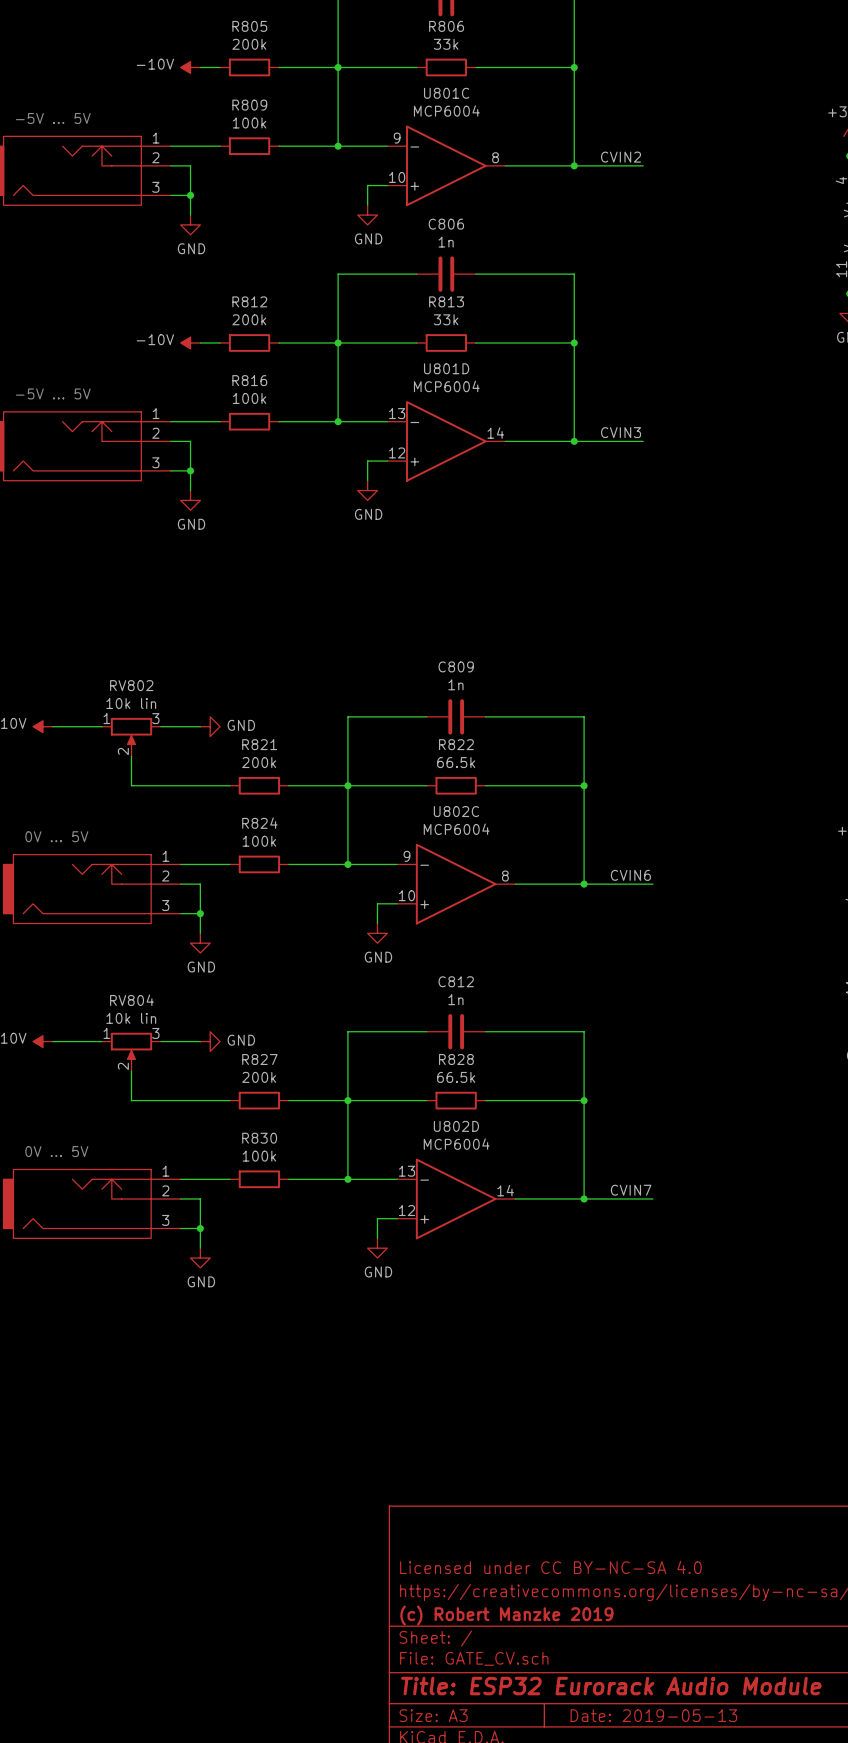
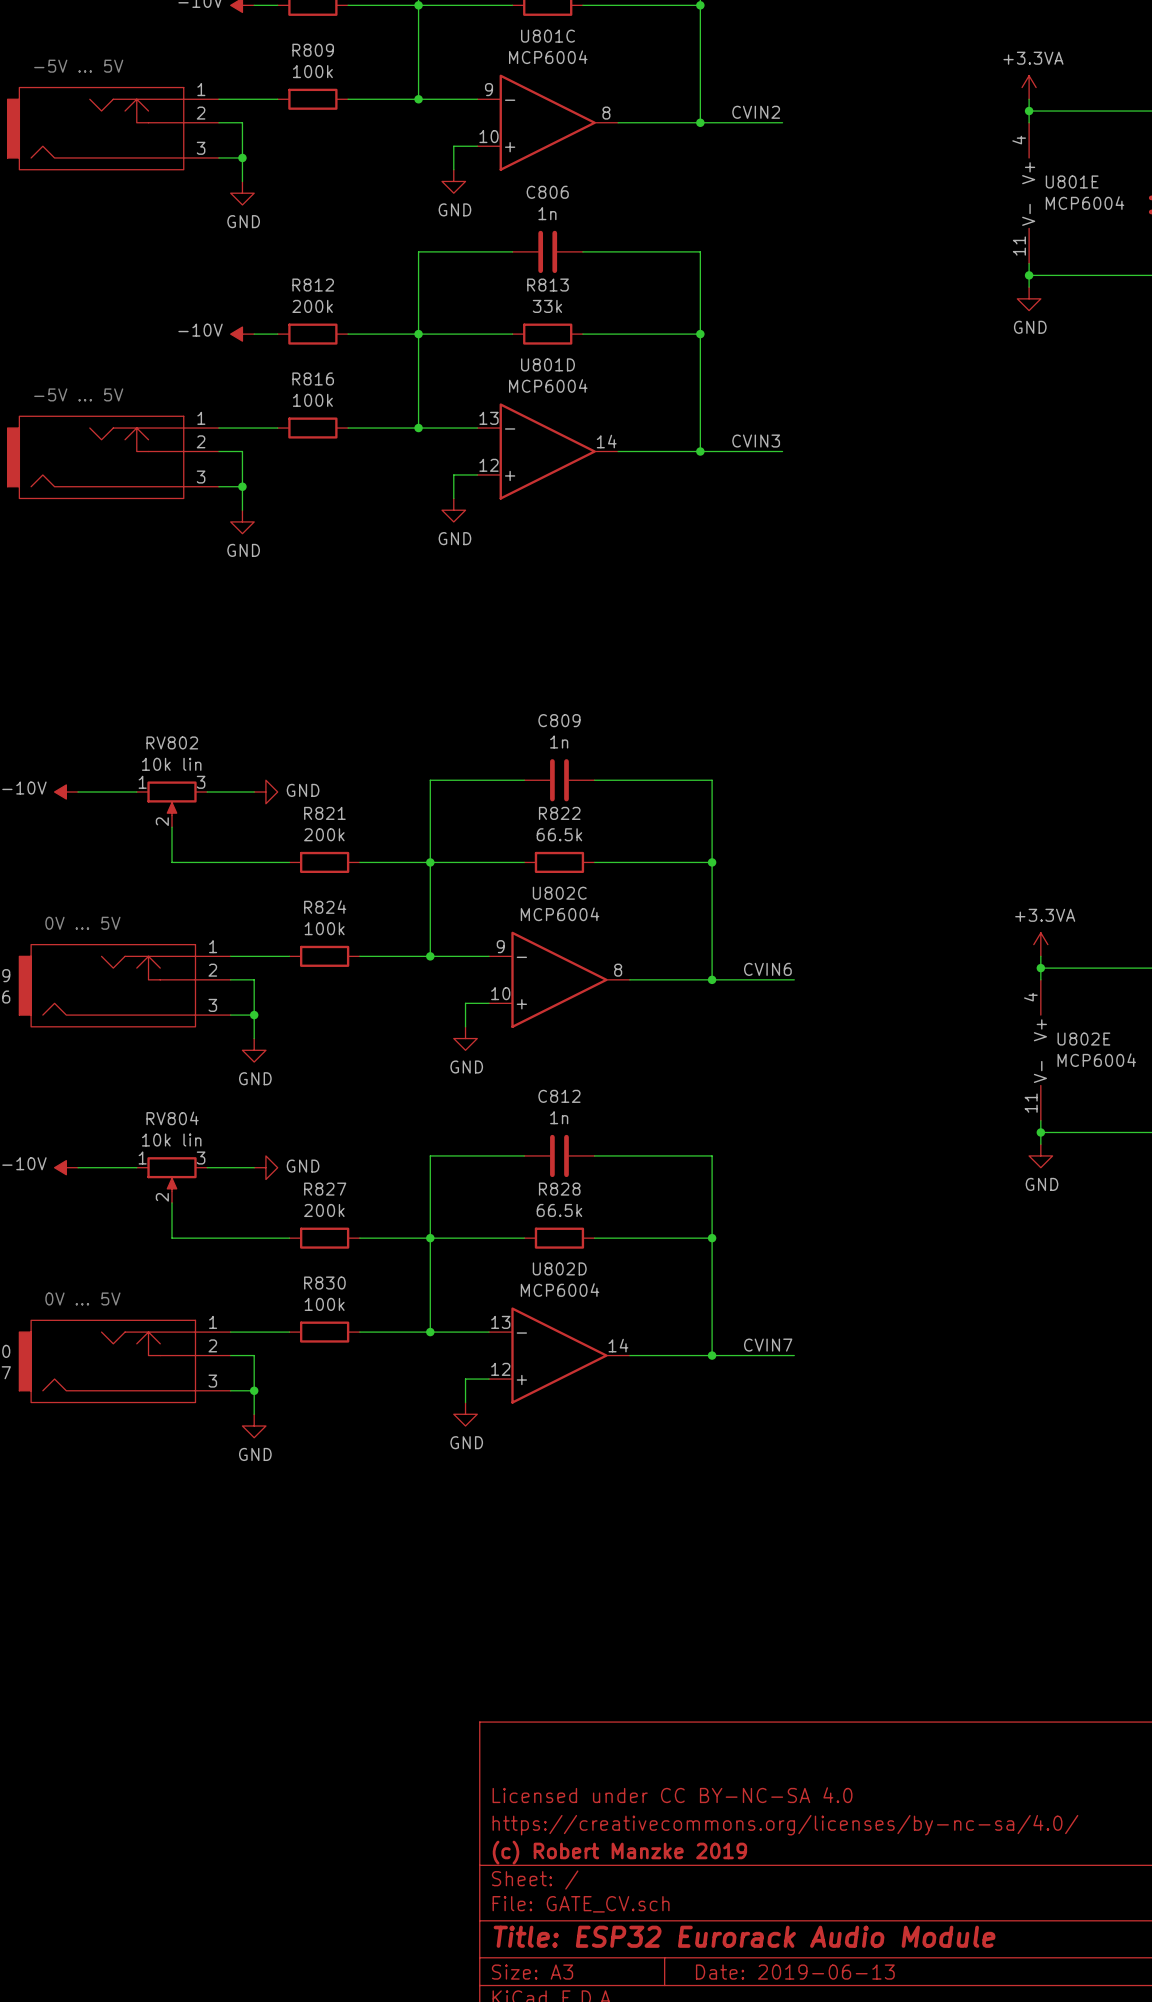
title block: Date: 2019-05-13 (653, 1715) -> Date: 2019-06-13 (795, 1972)

